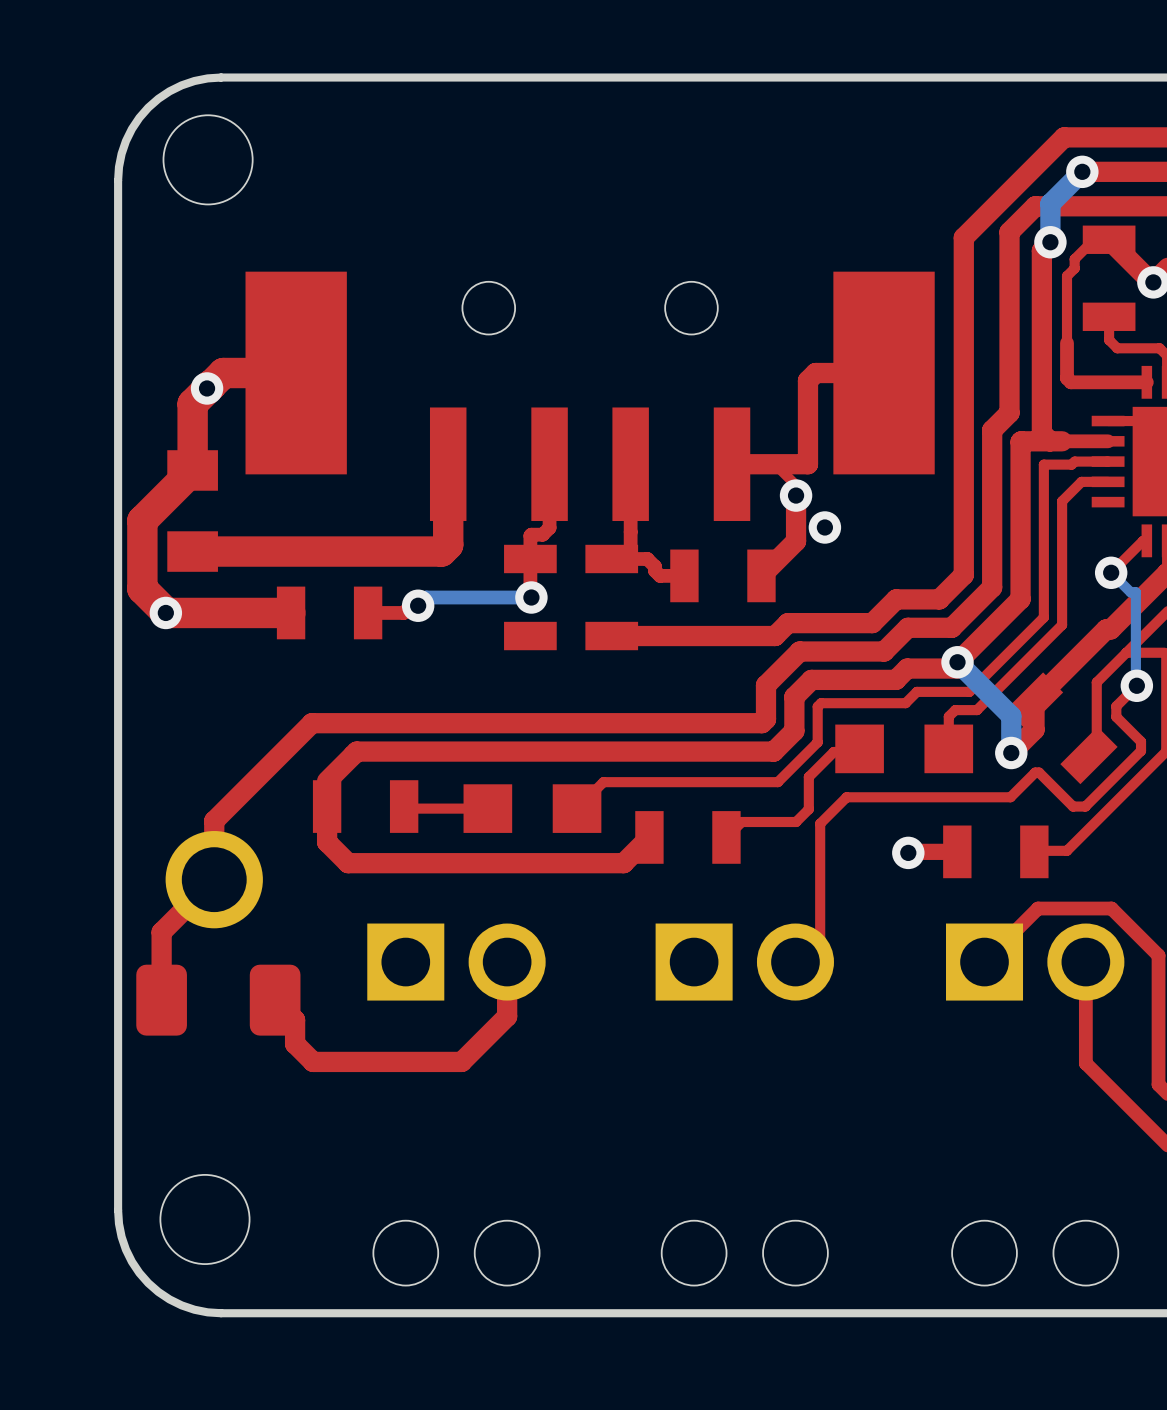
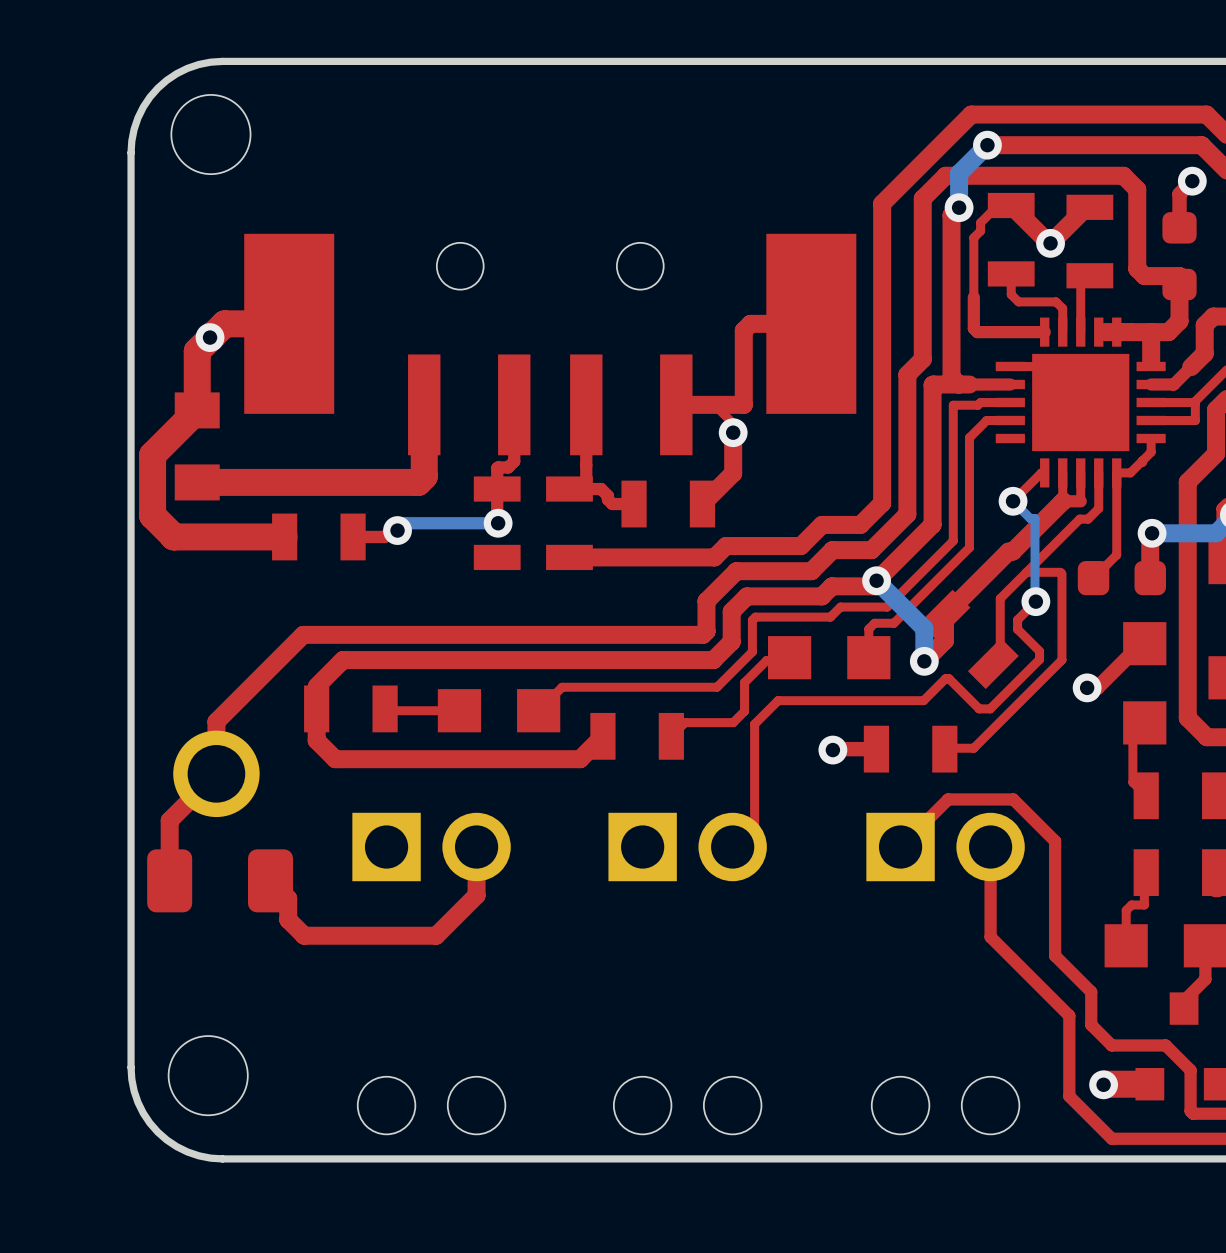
via: (824, 527) -> none
via: (165, 612) -> none

